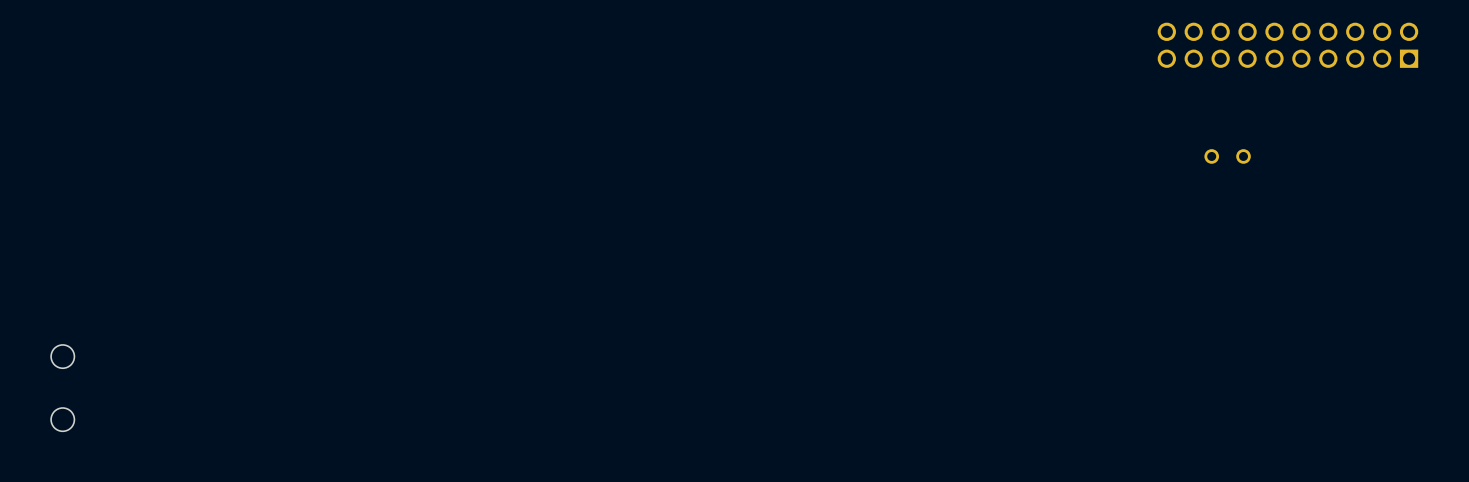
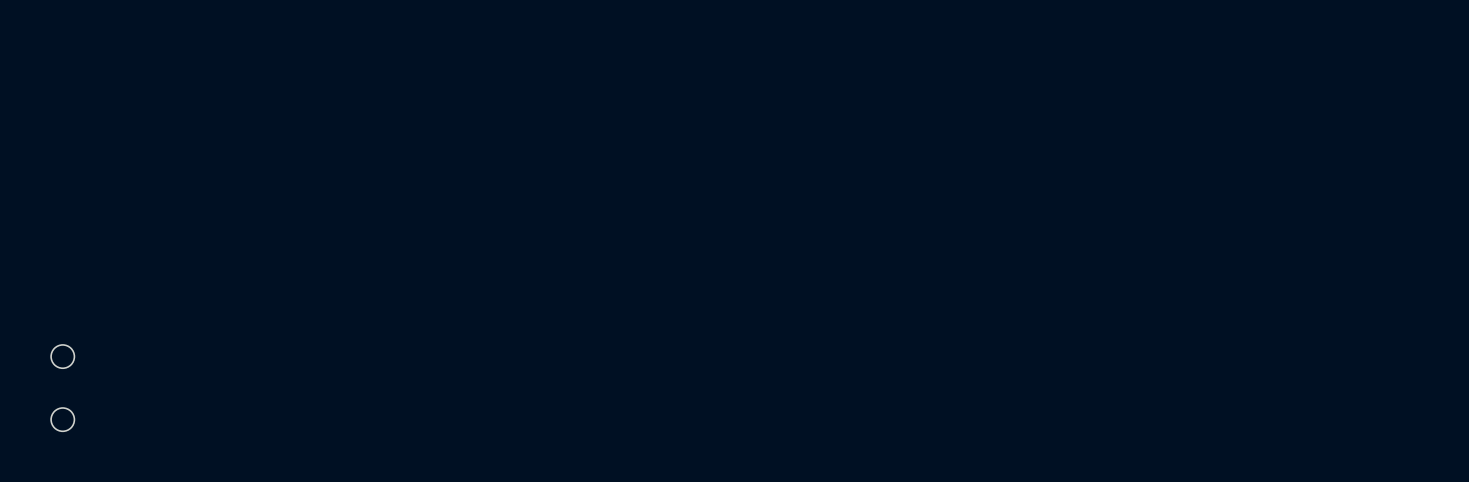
part: (1287, 45) -> none
part: (1227, 156) -> none

